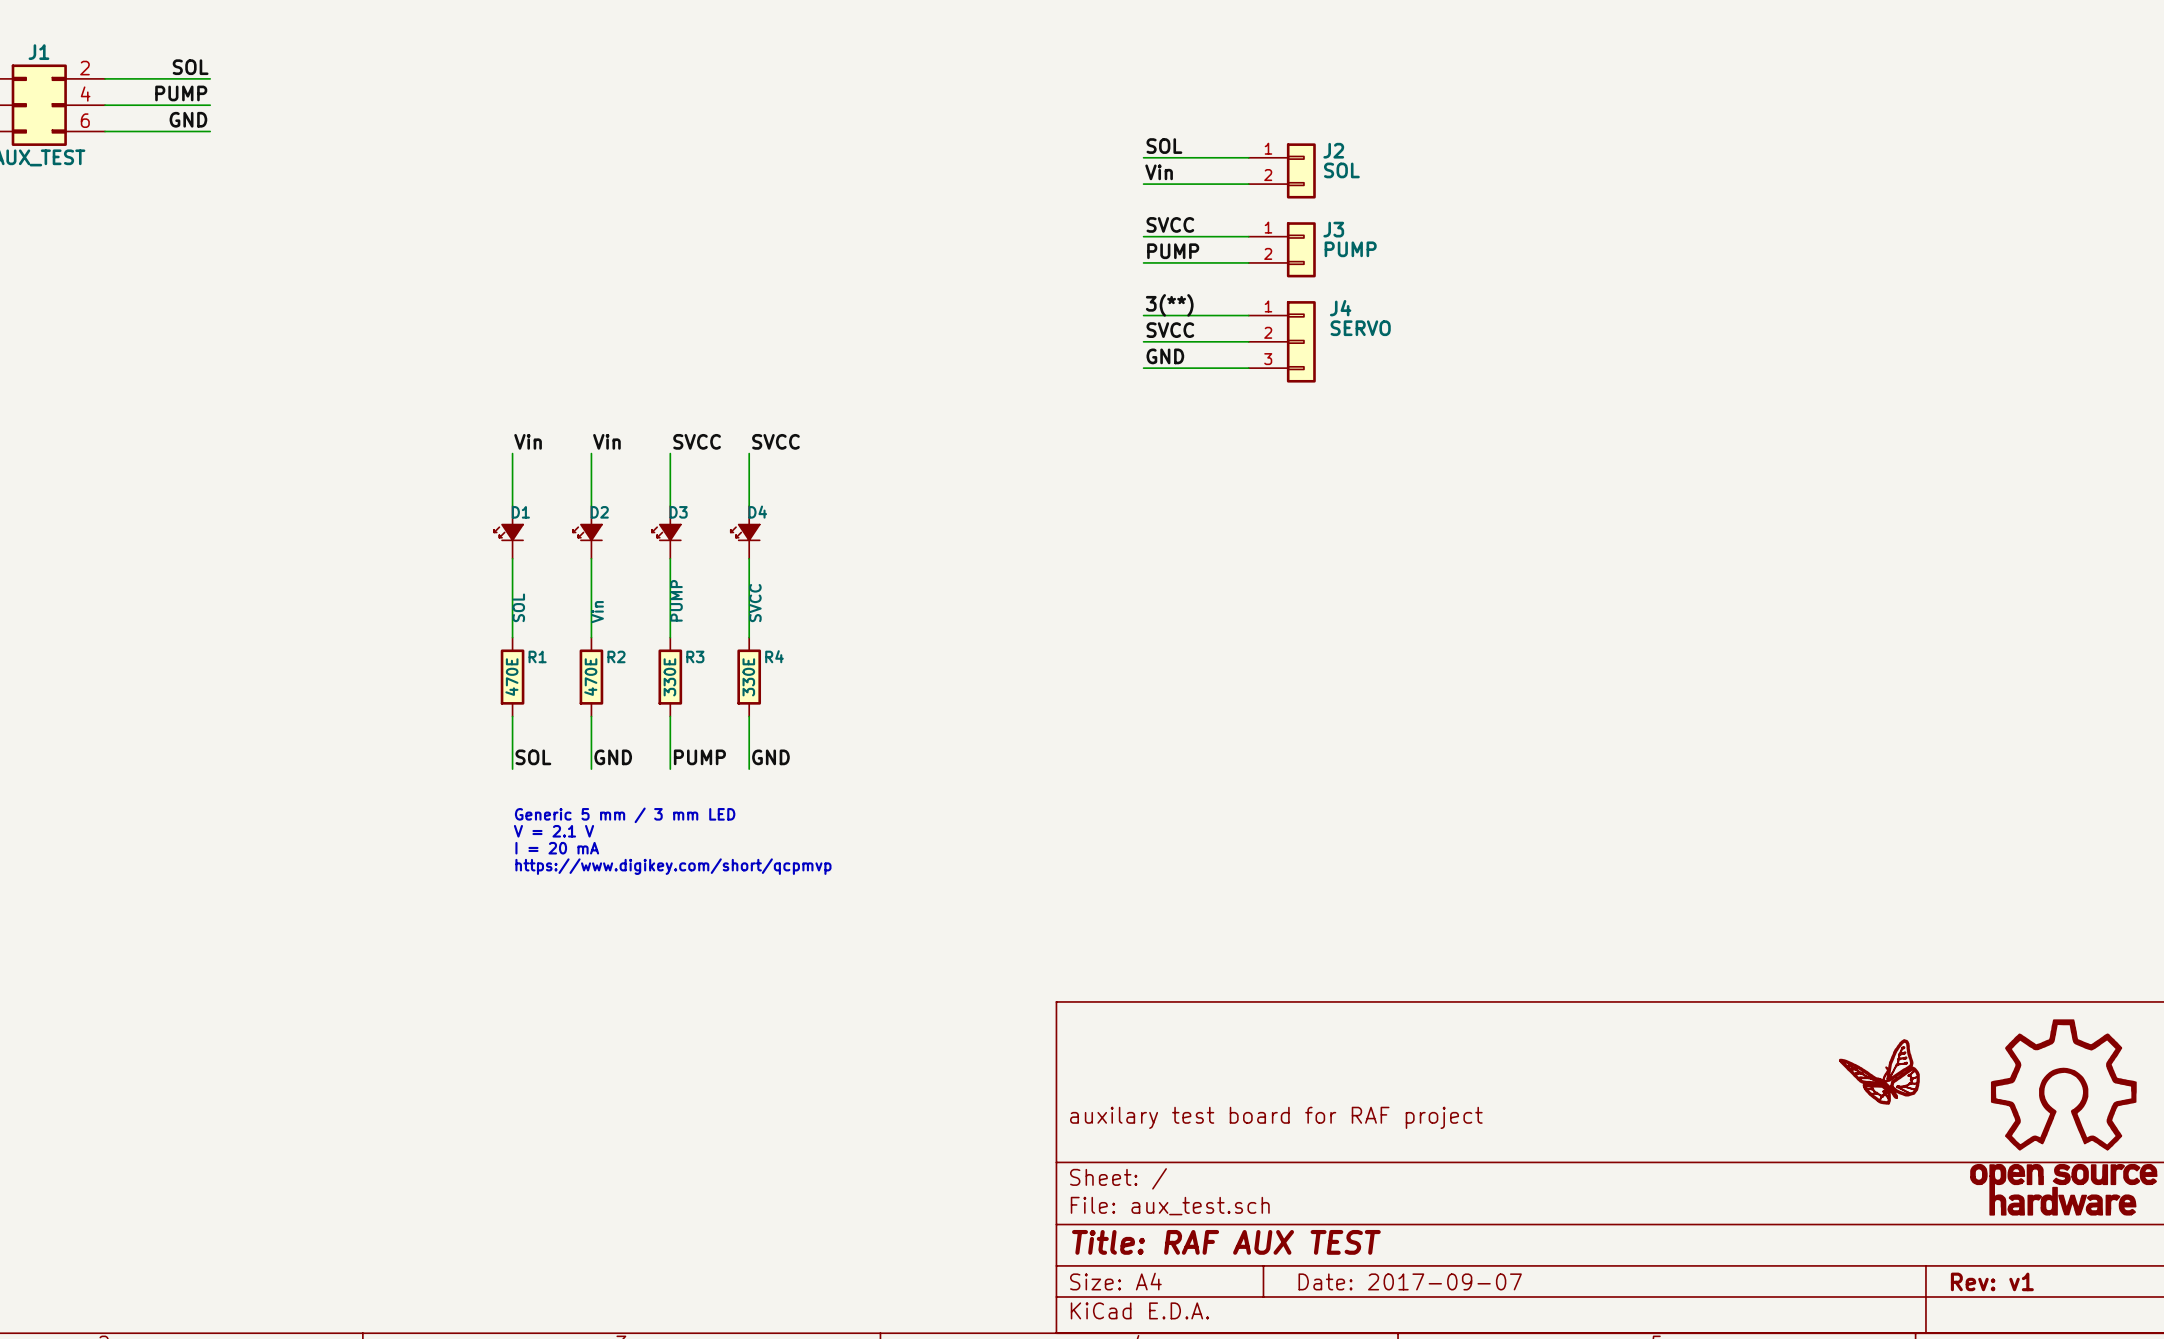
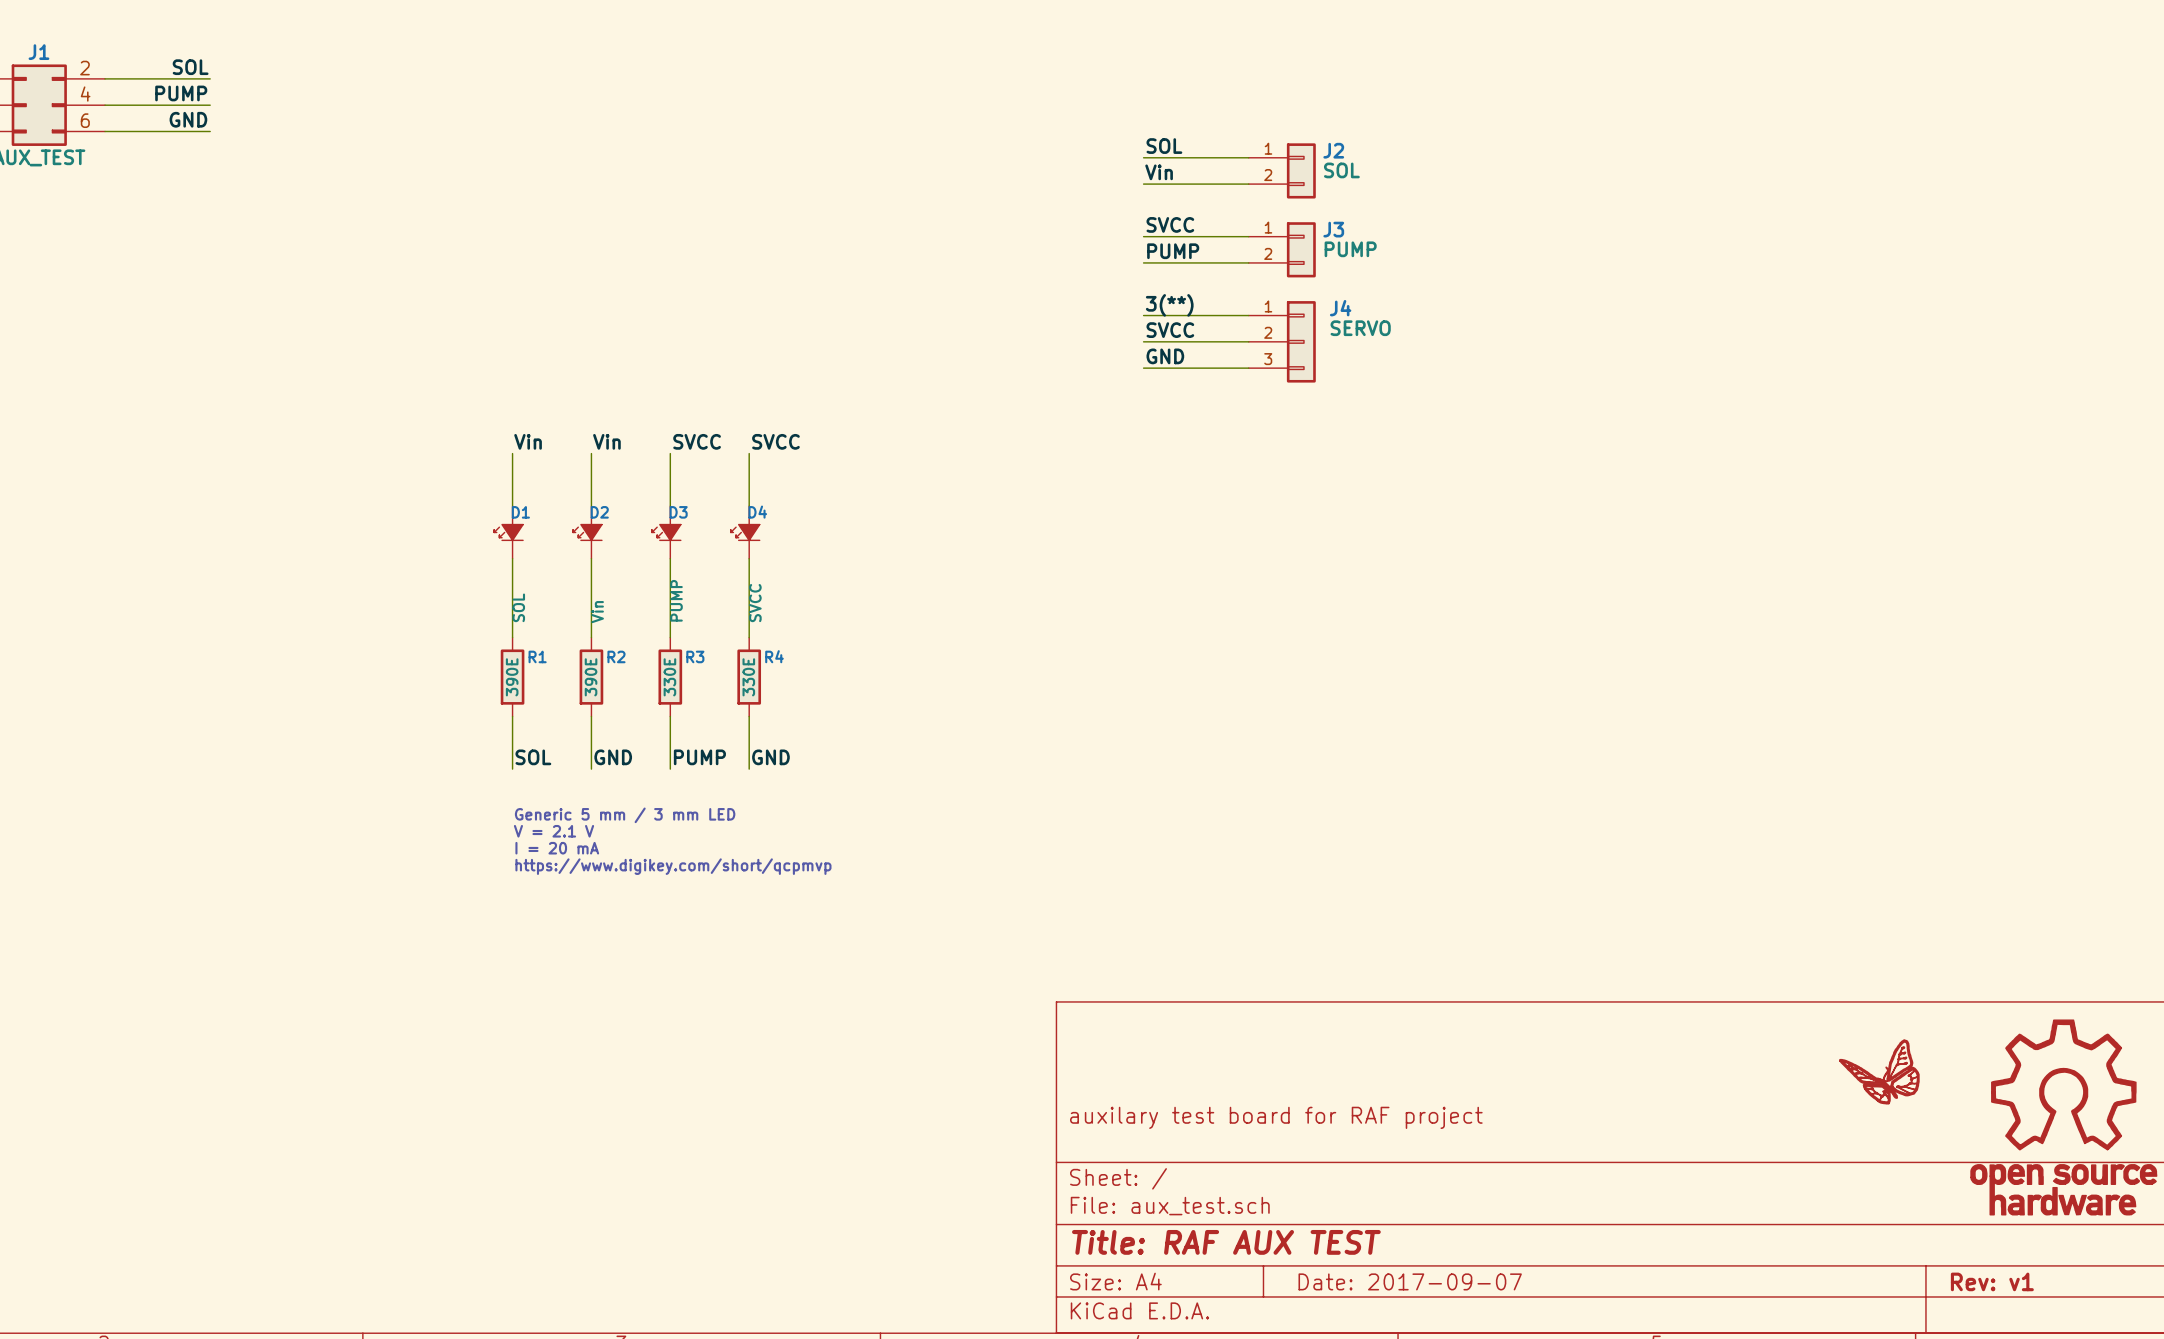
R1 value: 470E (511, 677) -> 390E (512, 677)
R2 value: 470E (590, 677) -> 390E (591, 677)

